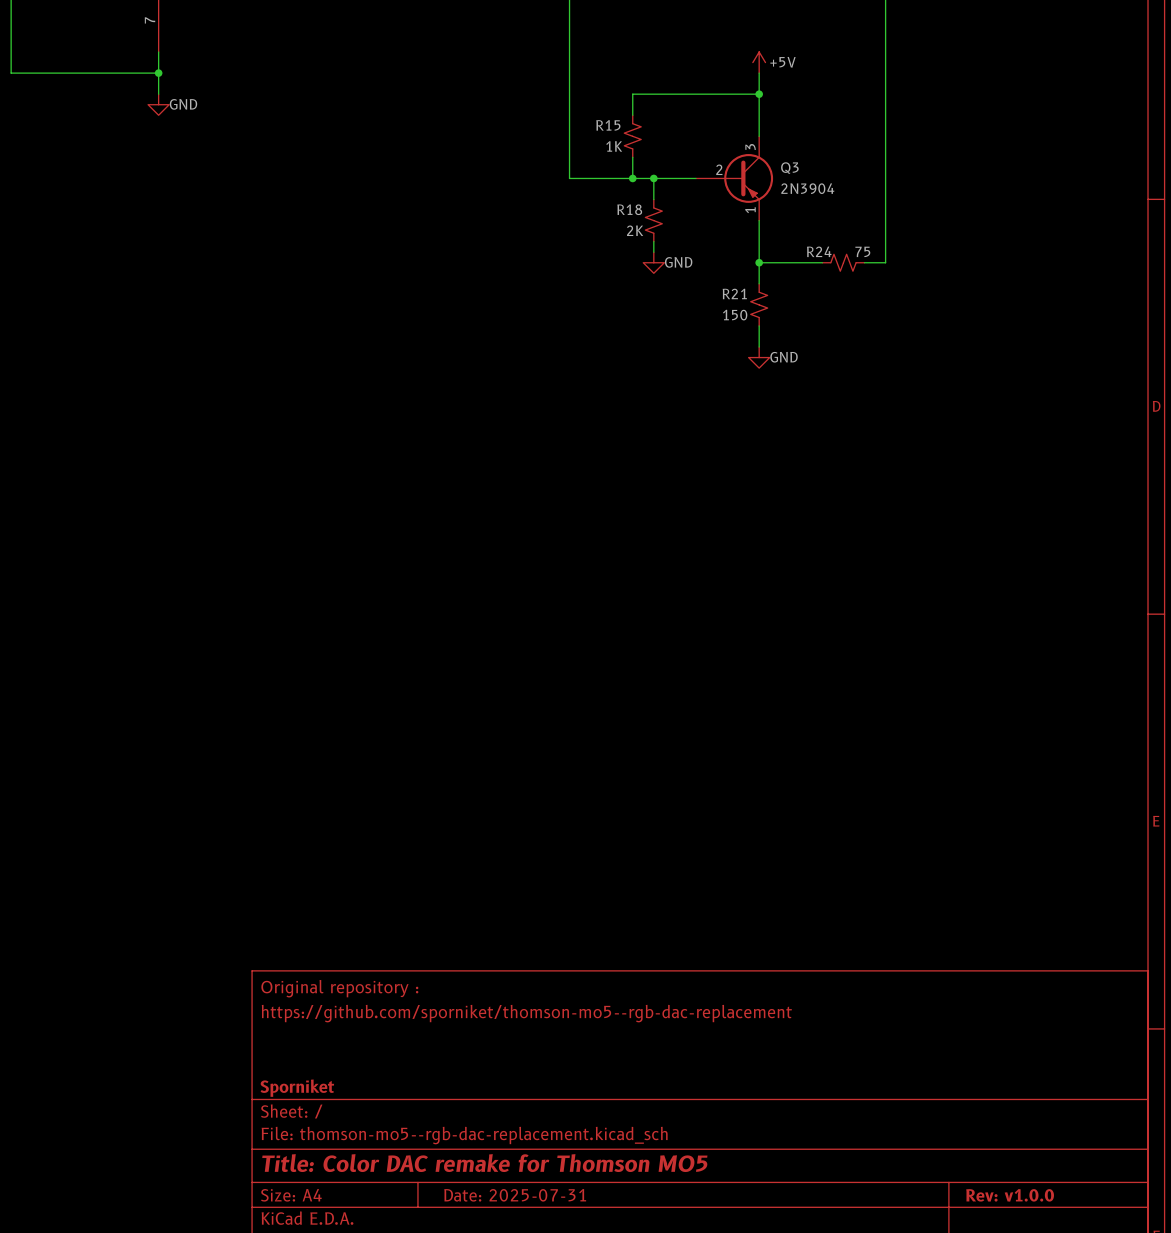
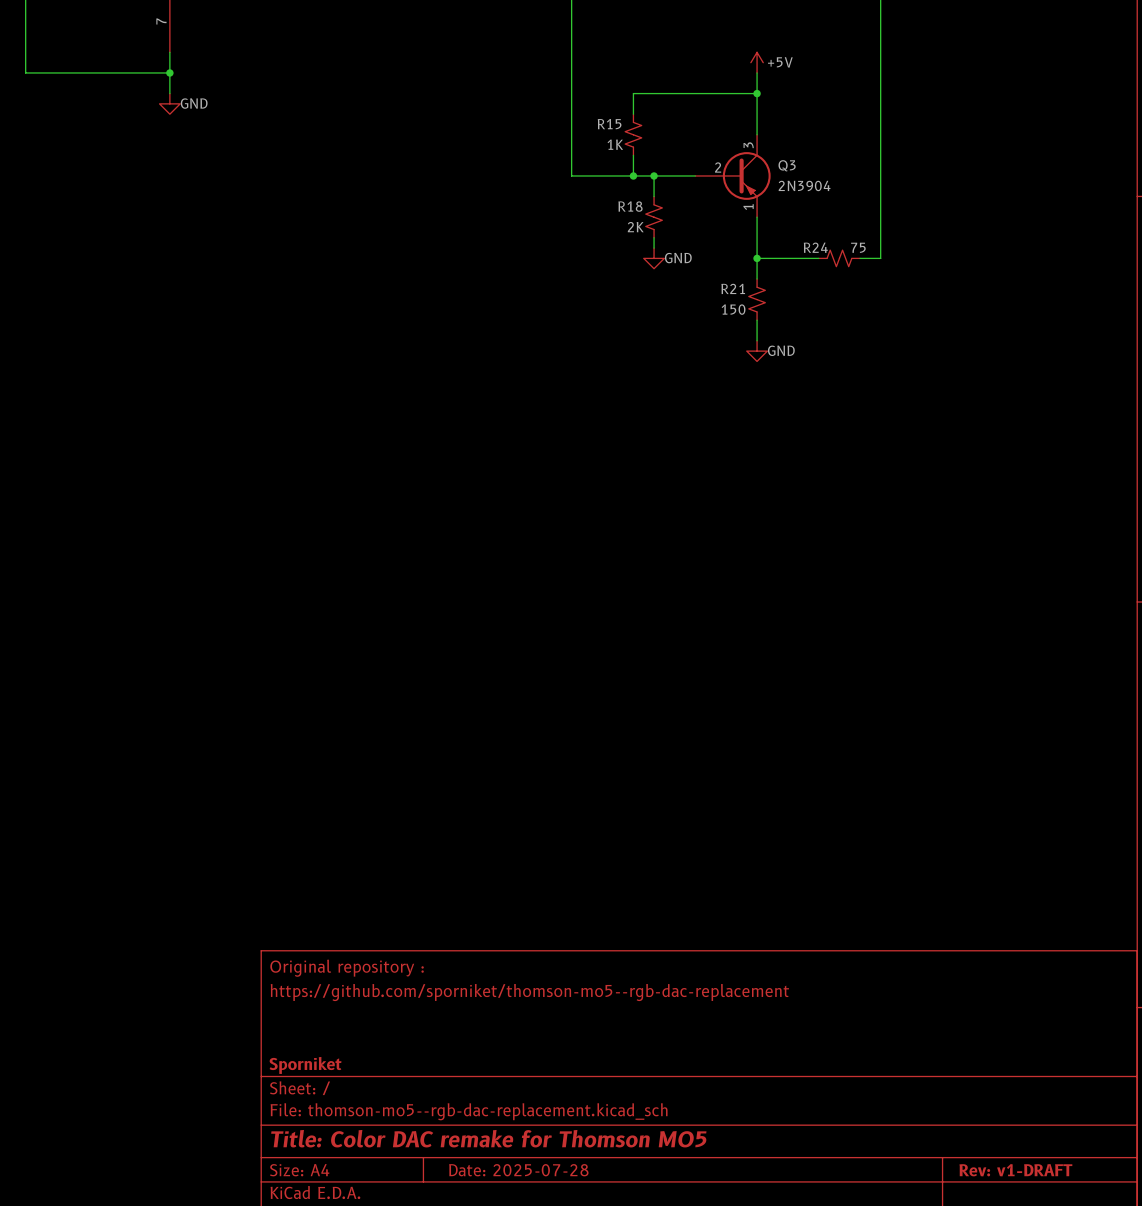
title block: Date: 2025-07-31 (515, 1195) -> Date: 2025-07-28 (518, 1170)
title block: Rev: v1.0.0 (1010, 1195) -> Rev: v1-DRAFT (1015, 1170)

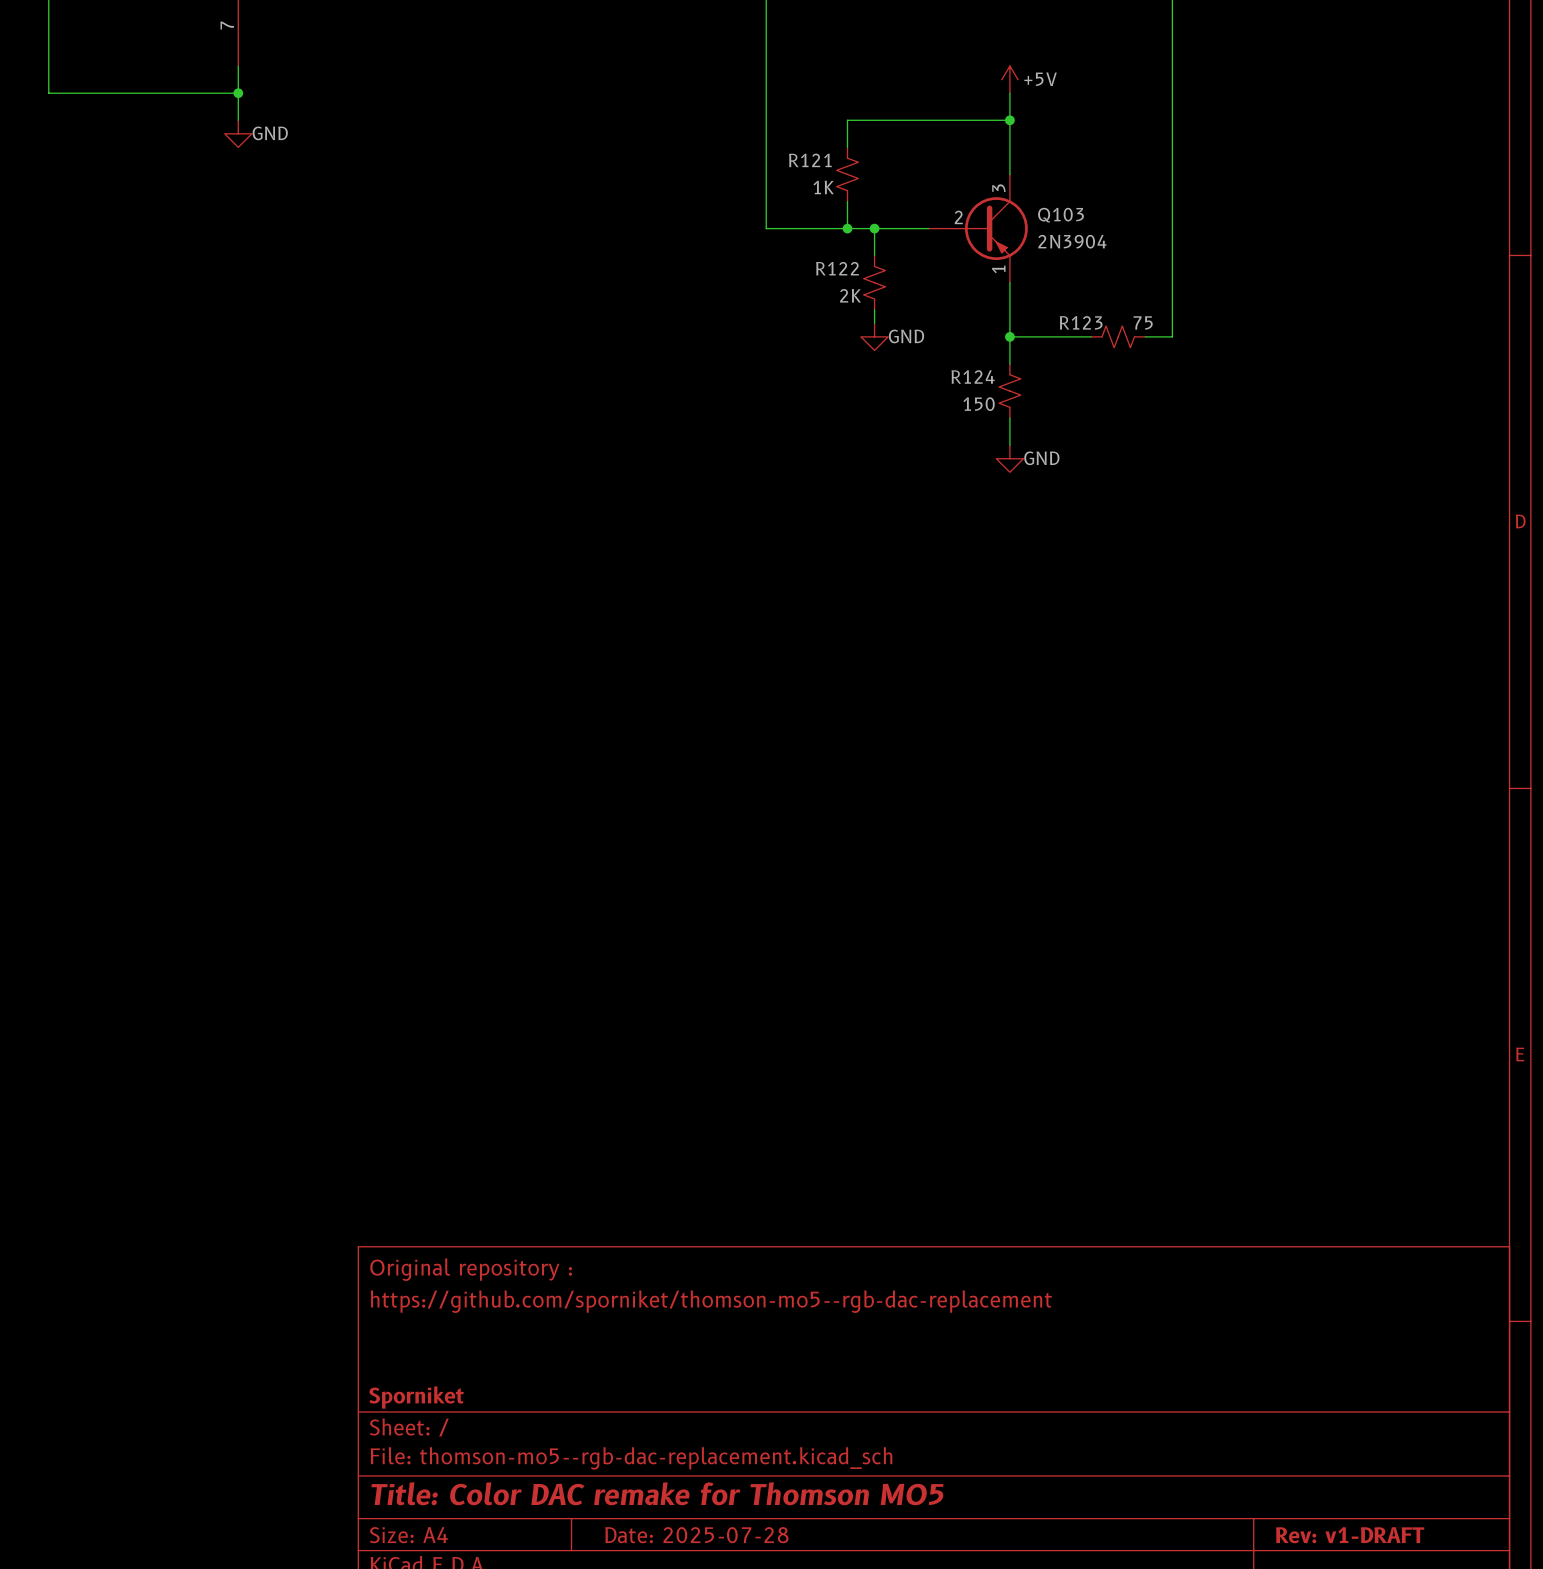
R15 name: R15 (609, 124) -> R121 (810, 160)
Q3 name: Q3 (787, 165) -> Q103 (1060, 215)
R18 name: R18 (630, 206) -> R122 (837, 268)
R24 name: R24 (815, 247) -> R123 (1081, 322)
R21 name: R21 (733, 288) -> R124 (973, 377)

